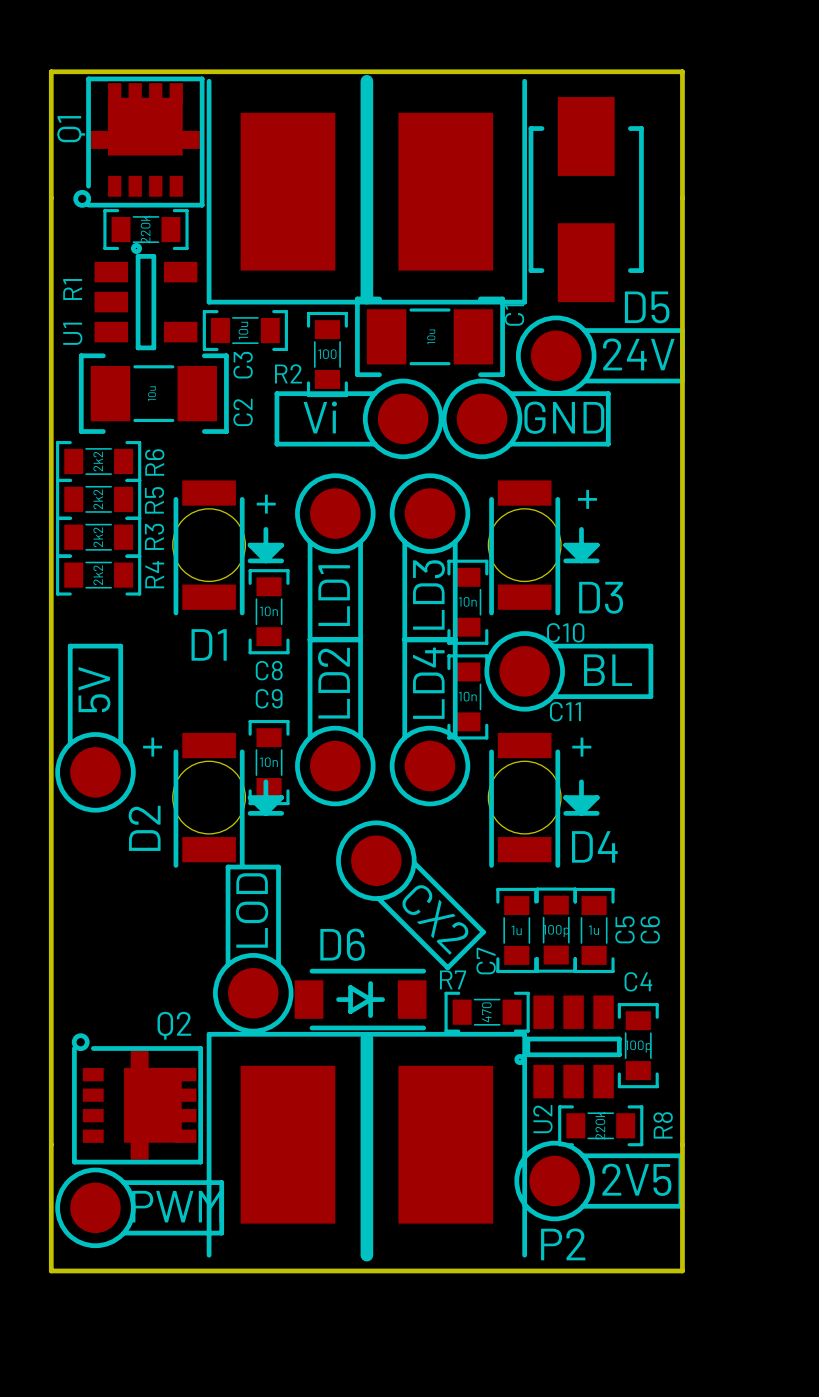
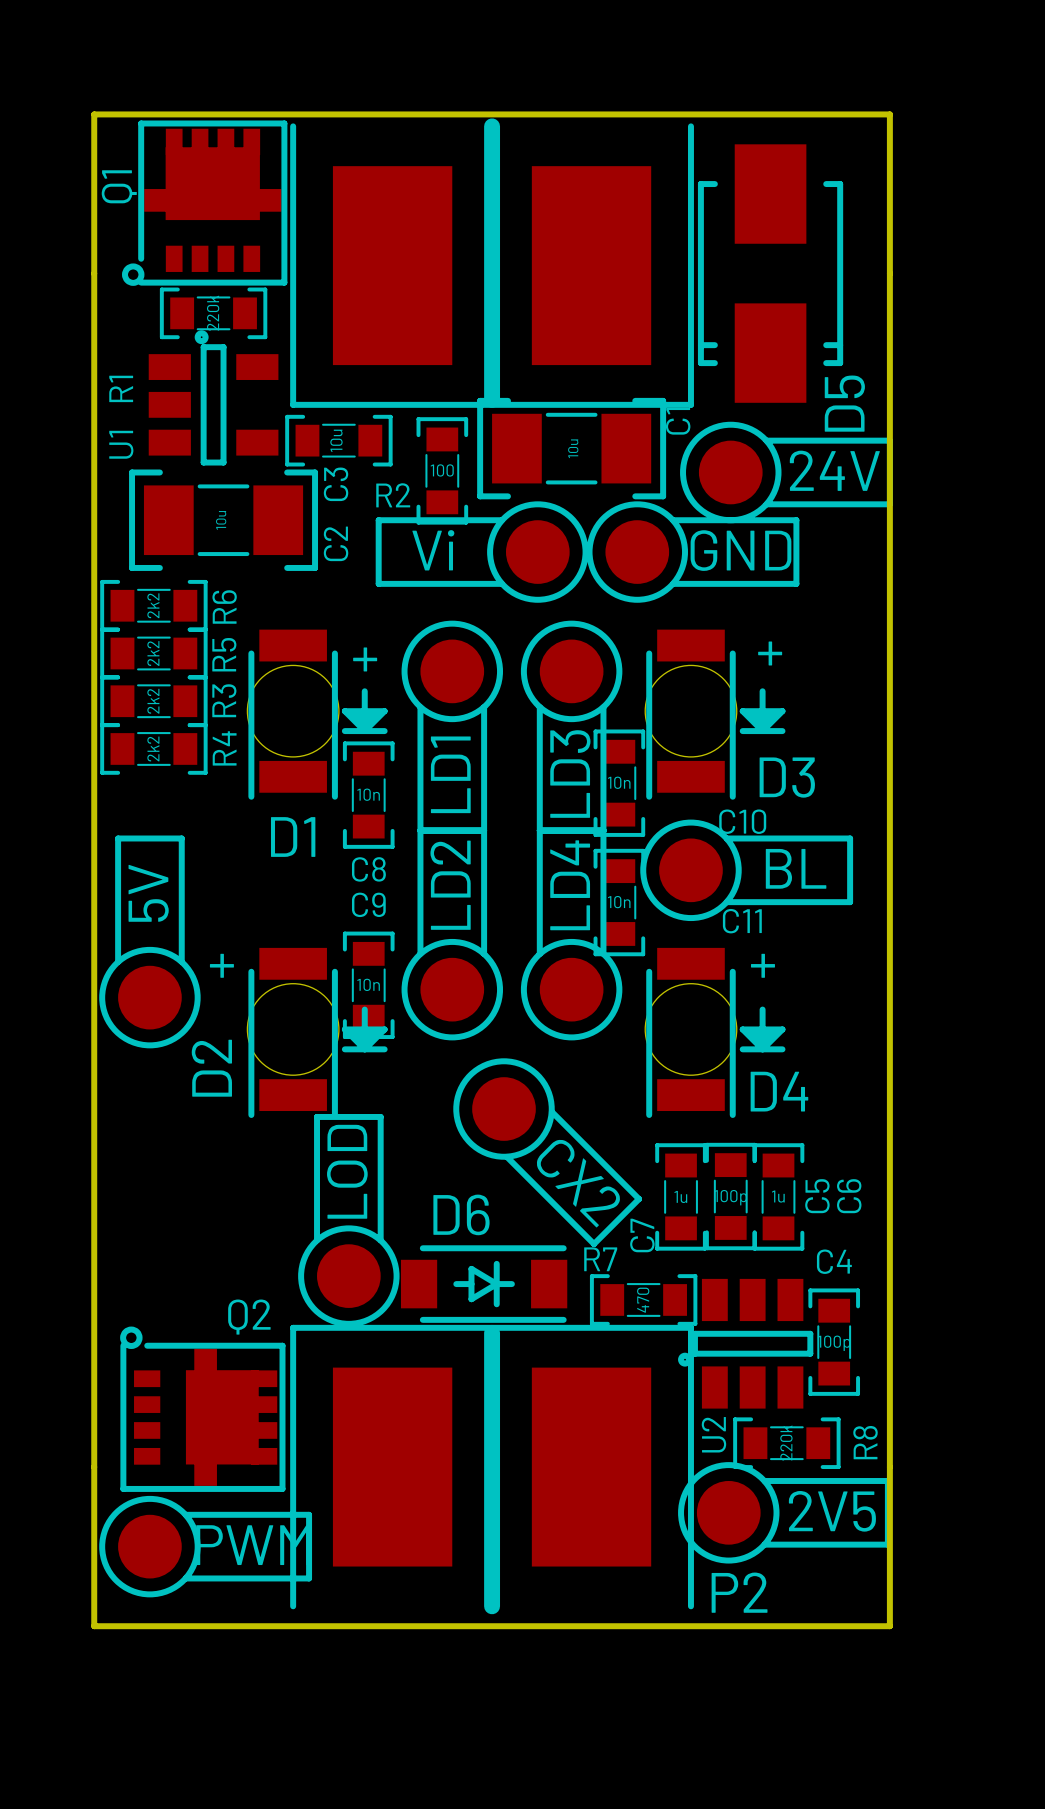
D5 footprint: [528, 97, 644, 303] -> [697, 144, 844, 403]
D5 name rotation: 0° (647, 307) -> 90° counterclockwise (844, 403)

